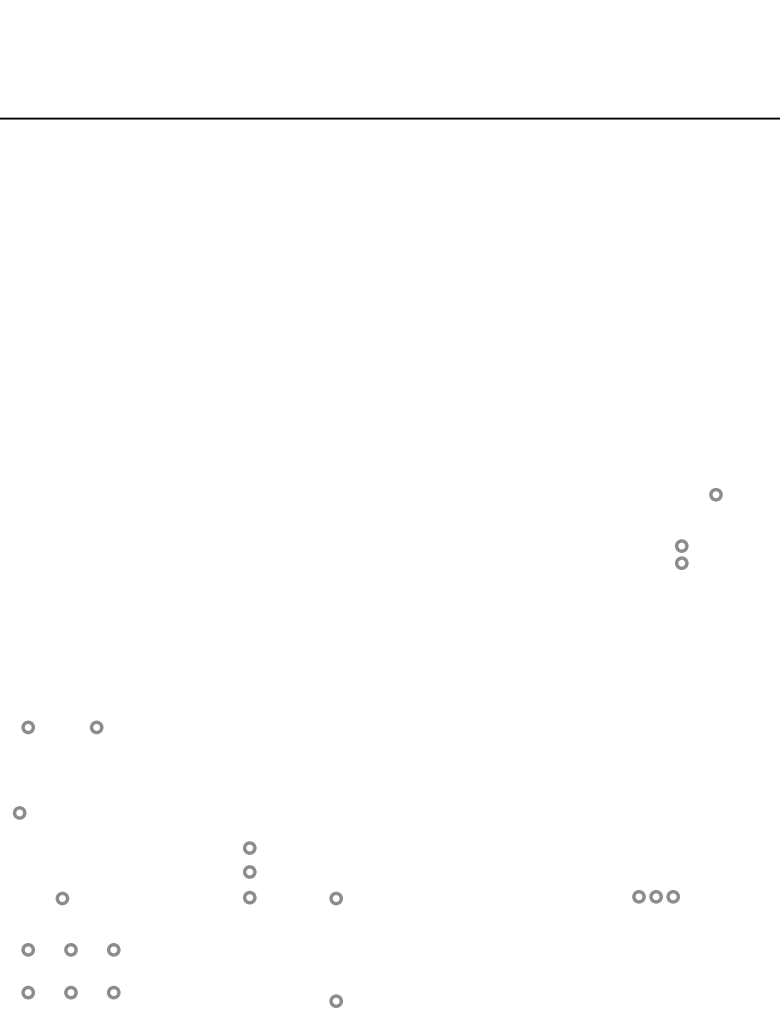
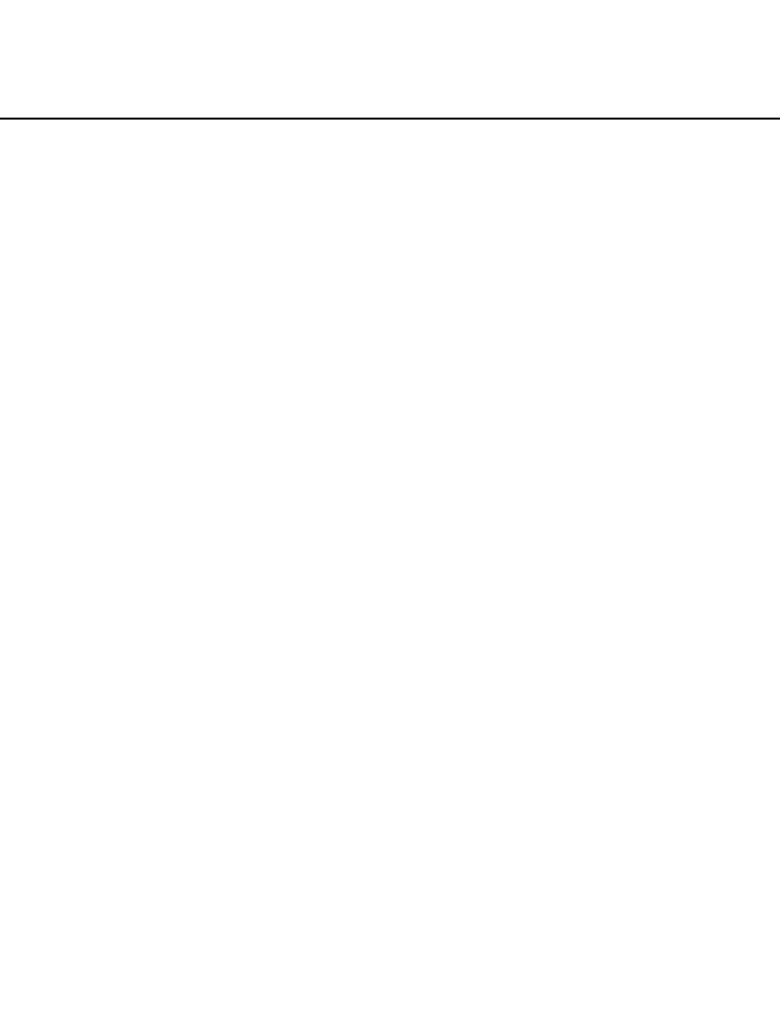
via: (715, 494) -> none
via: (681, 546) -> none
via: (681, 563) -> none
via: (28, 727) -> none
via: (96, 727) -> none
via: (19, 812) -> none
via: (249, 848) -> none
via: (249, 872) -> none
via: (639, 896) -> none
via: (656, 896) -> none
via: (673, 896) -> none
via: (249, 897) -> none
via: (62, 898) -> none
via: (336, 898) -> none
via: (28, 949) -> none
via: (70, 949) -> none
via: (113, 949) -> none
via: (28, 992) -> none
via: (70, 992) -> none
via: (113, 992) -> none
via: (336, 1001) -> none

